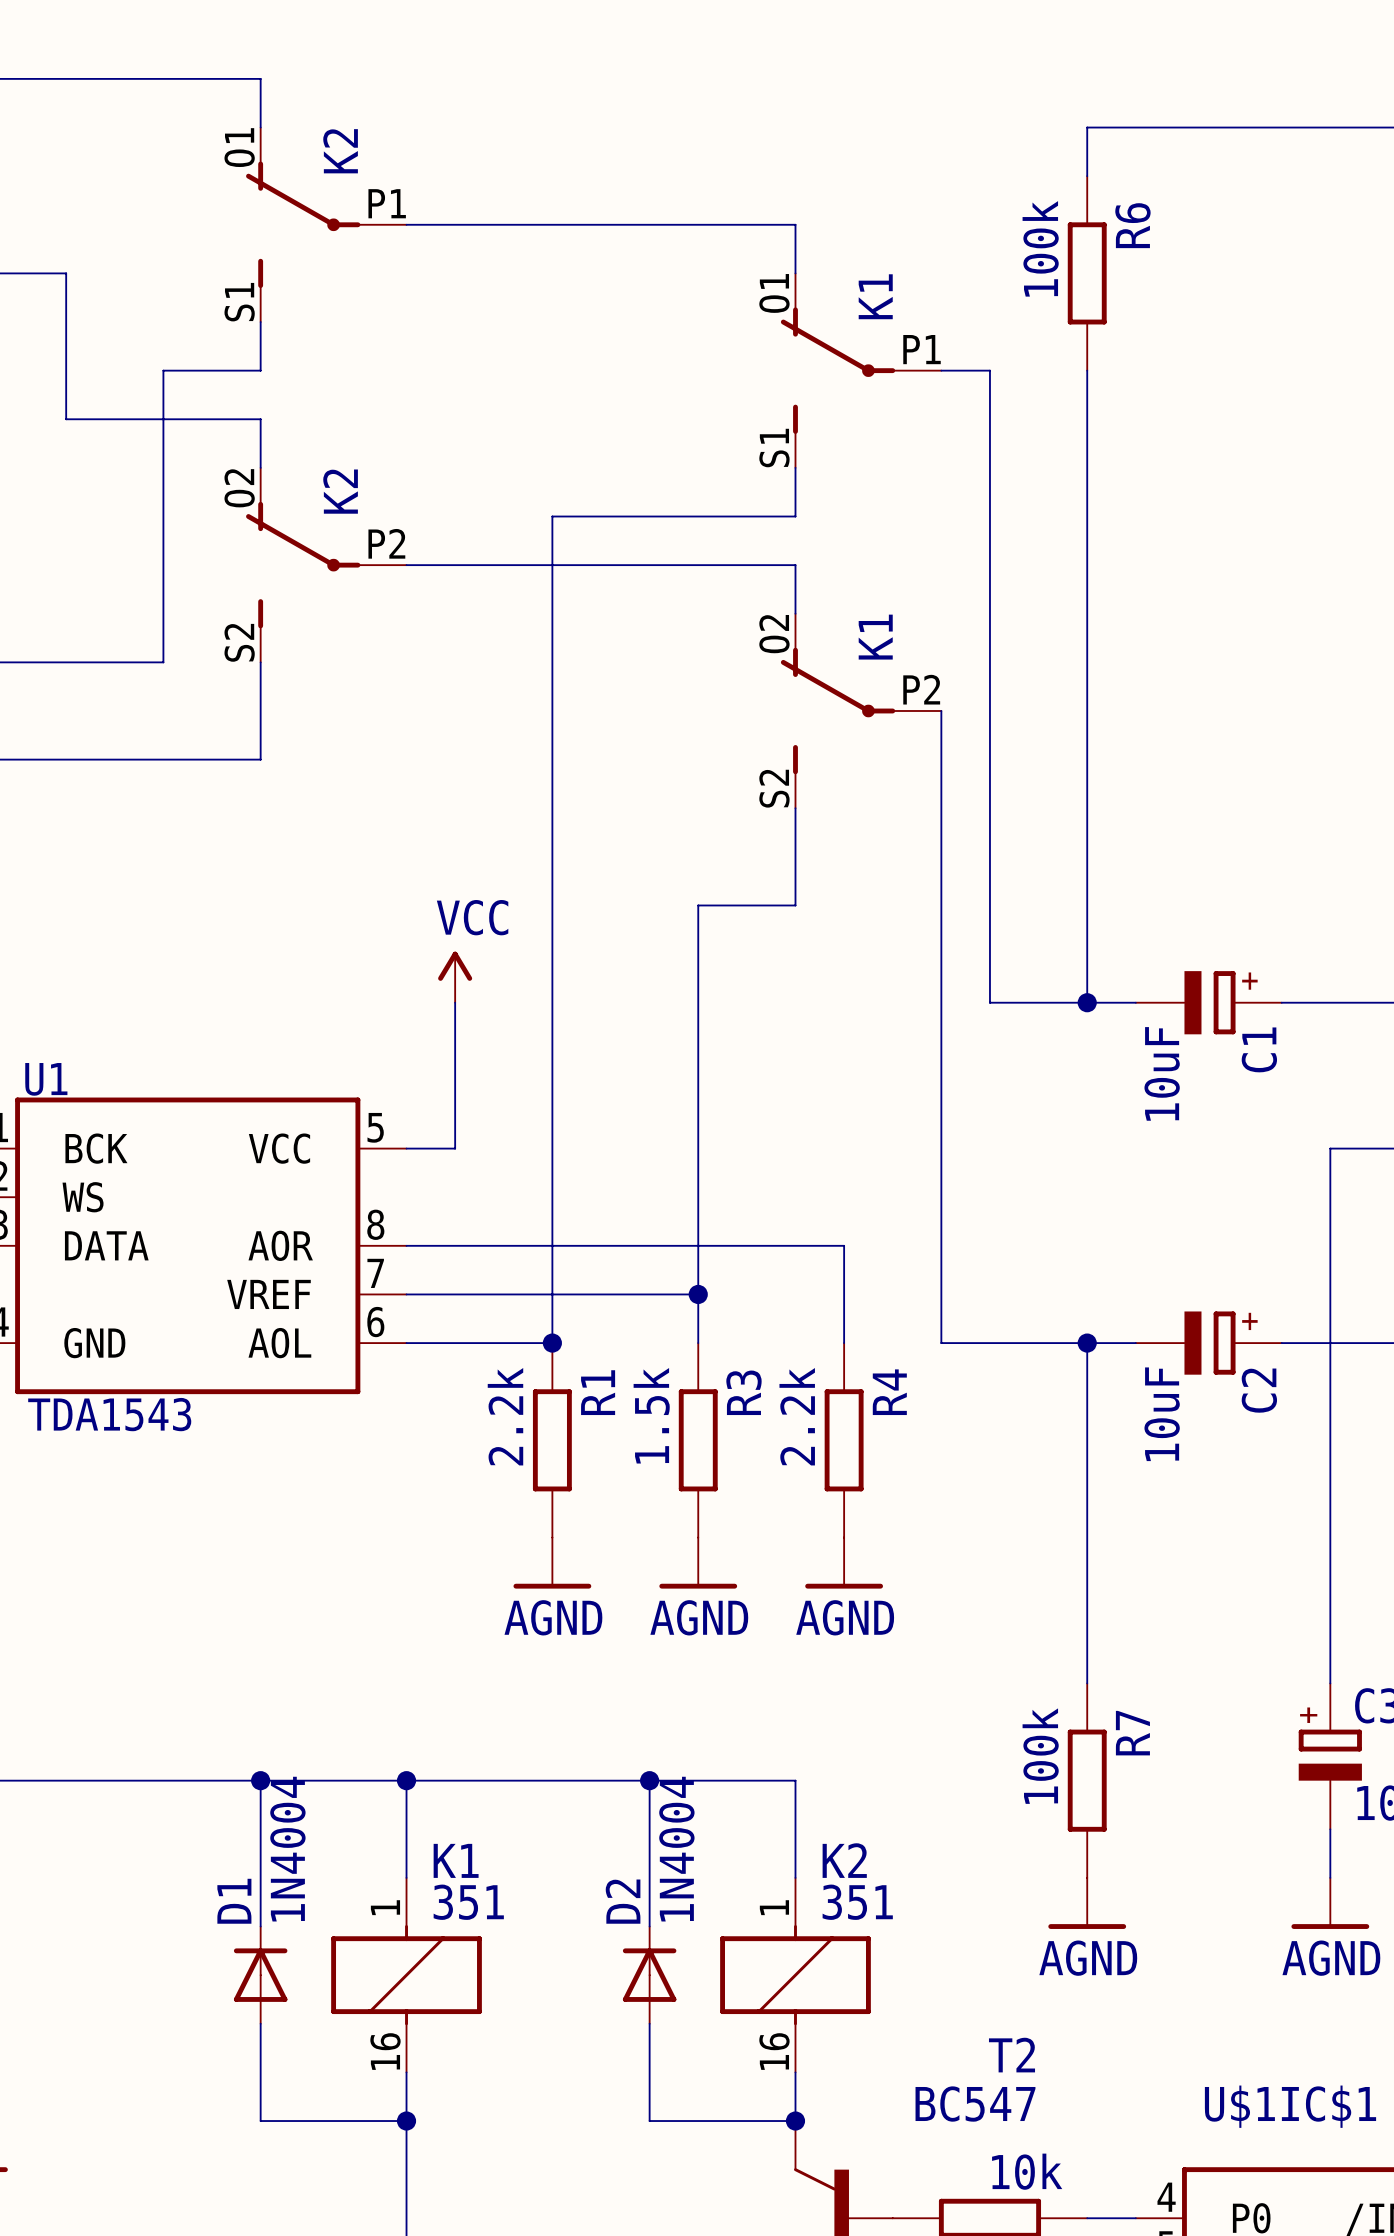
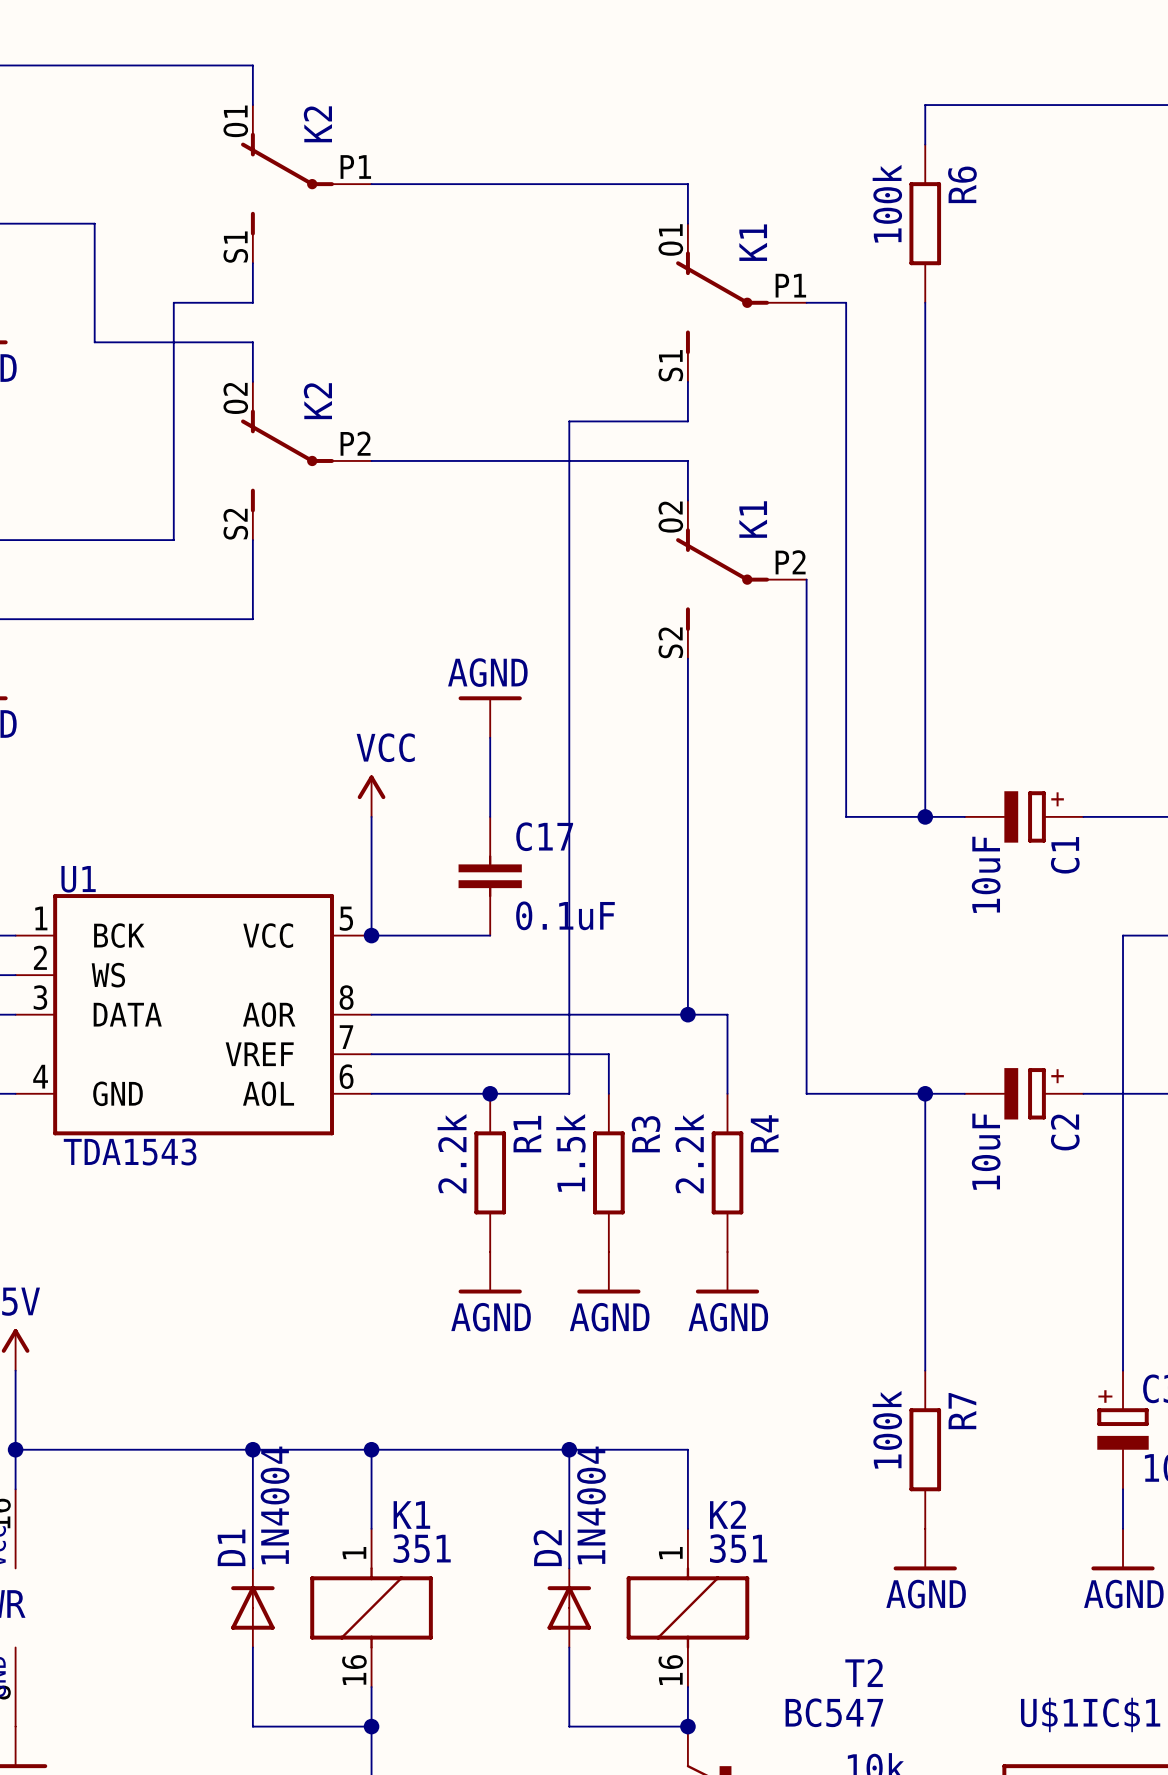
wire: (649, 516) (552, 516) (552, 905) -> (569, 421) (569, 1093) (490, 1093)
power symbol: none -> AGND (490, 717)
wire: (795, 905) (698, 905) (698, 1294) -> (687, 737) (687, 1014)
power symbol position: VCC (455, 977) -> VCC (371, 796)
wire: none -> (371, 816) (371, 935)
wire: (455, 1002) (455, 1148) -> (490, 935) (411, 935)
wire: (552, 1002) (552, 1343) -> none
C17: none -> 0.1uF (490, 876)
junction: none -> (371, 935)
junction position: (698, 1294) -> (687, 1014)

